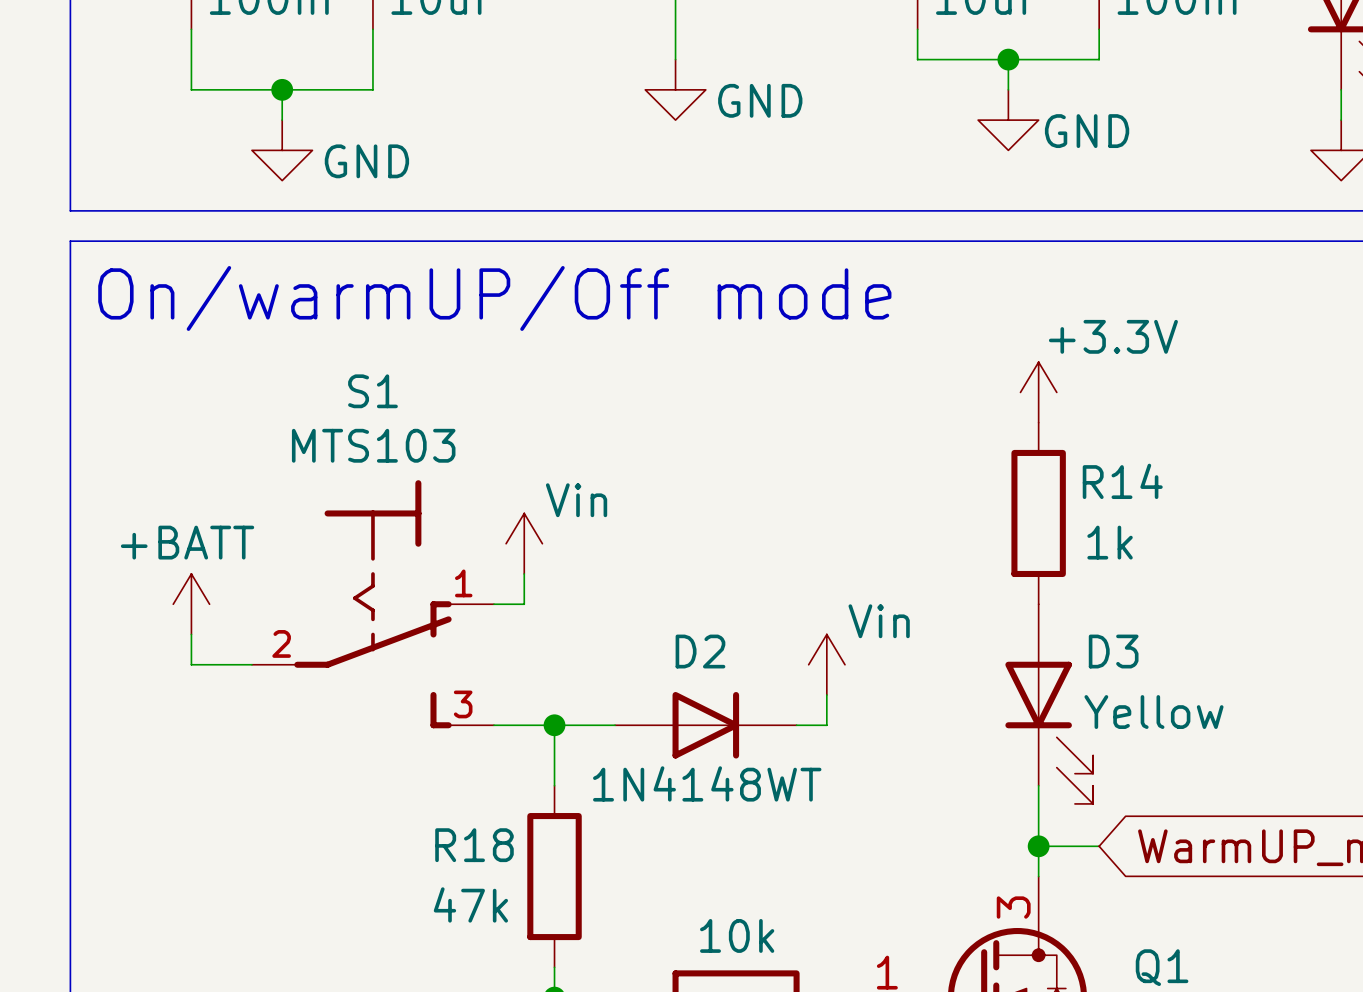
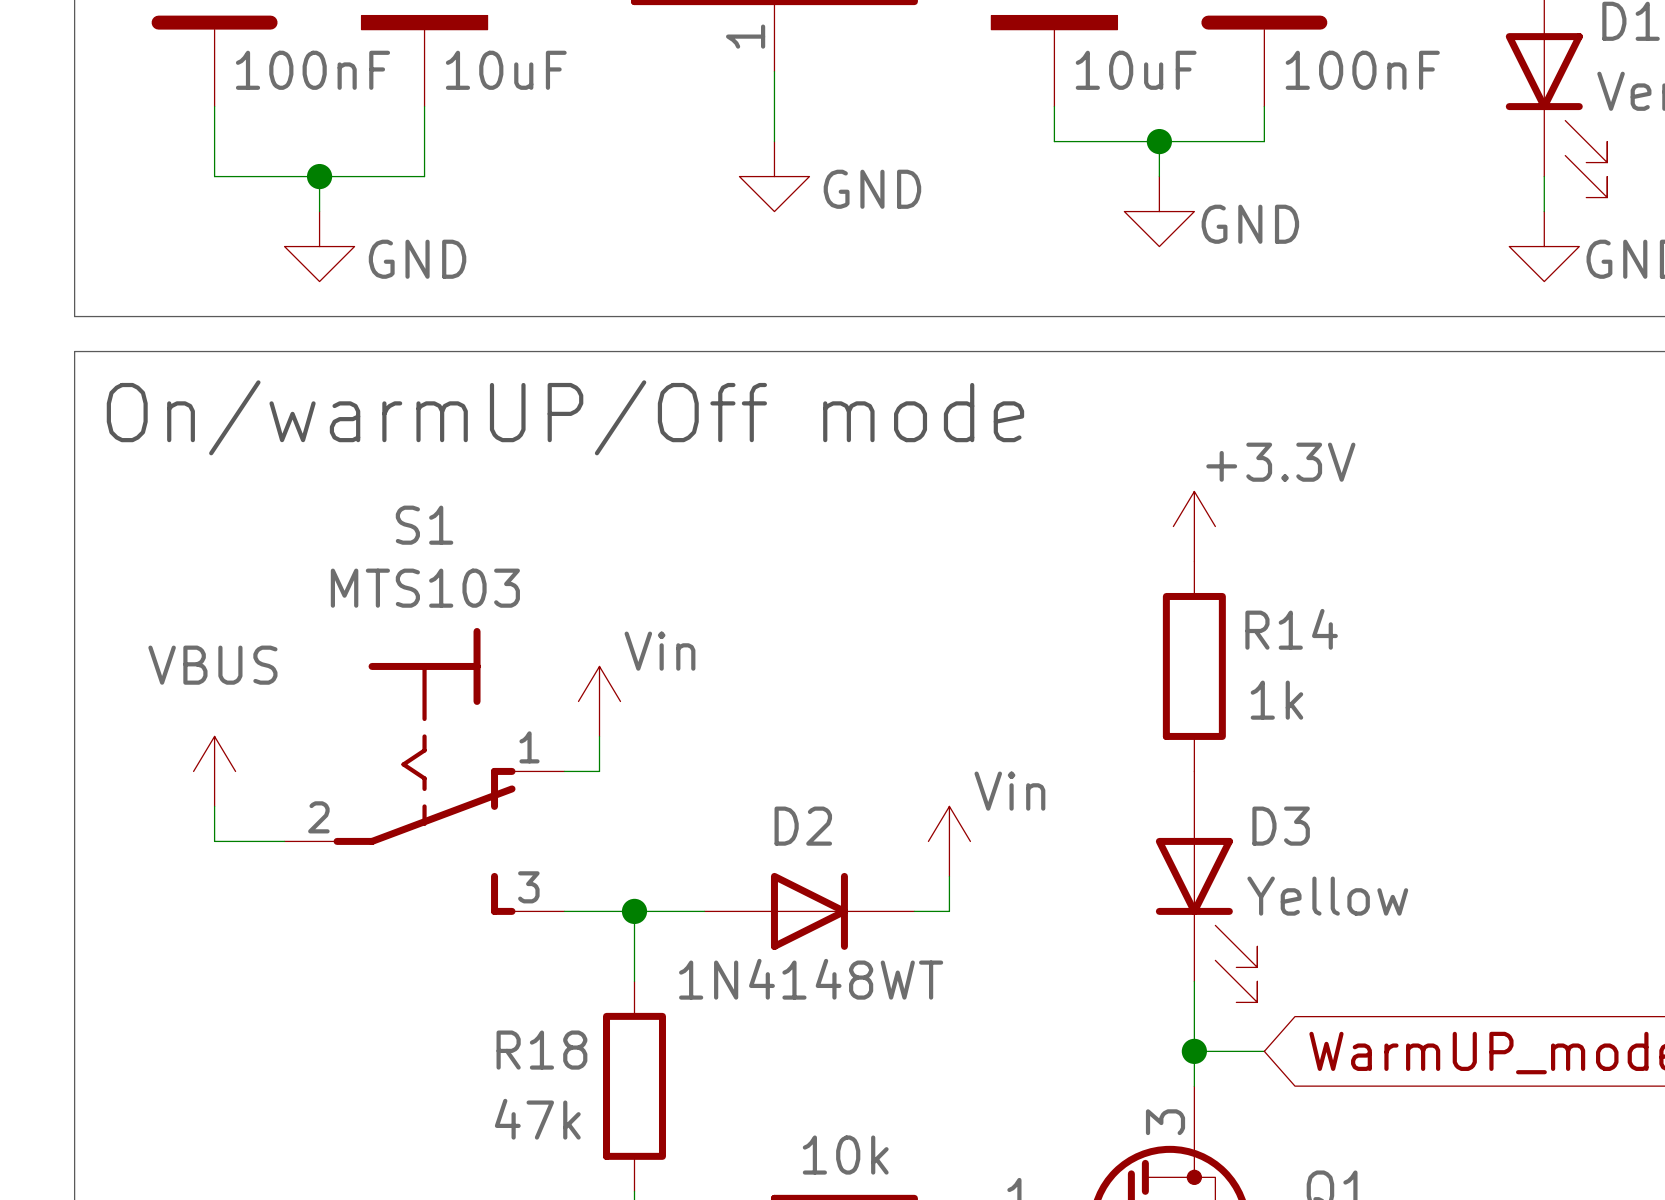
power symbol: +BATT (191, 604) -> VBUS (214, 771)

